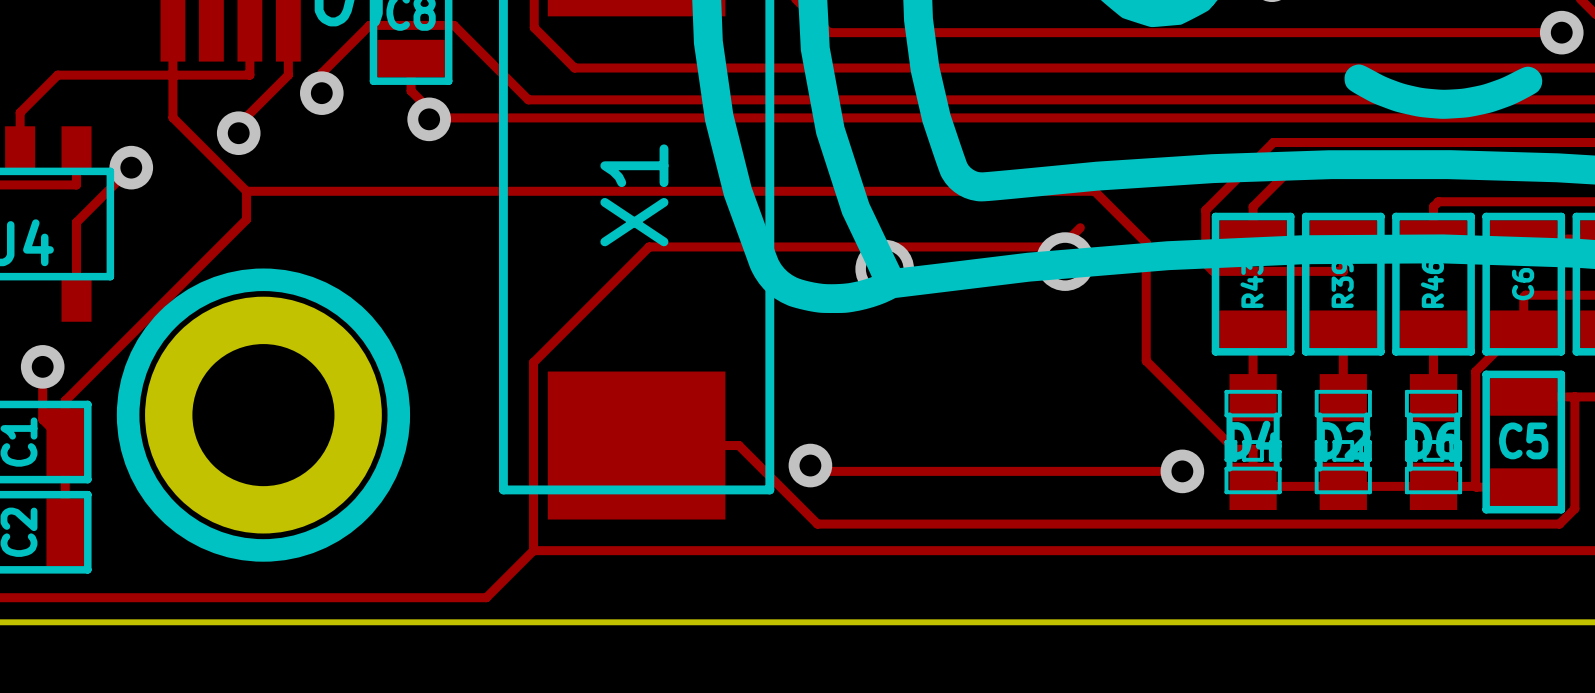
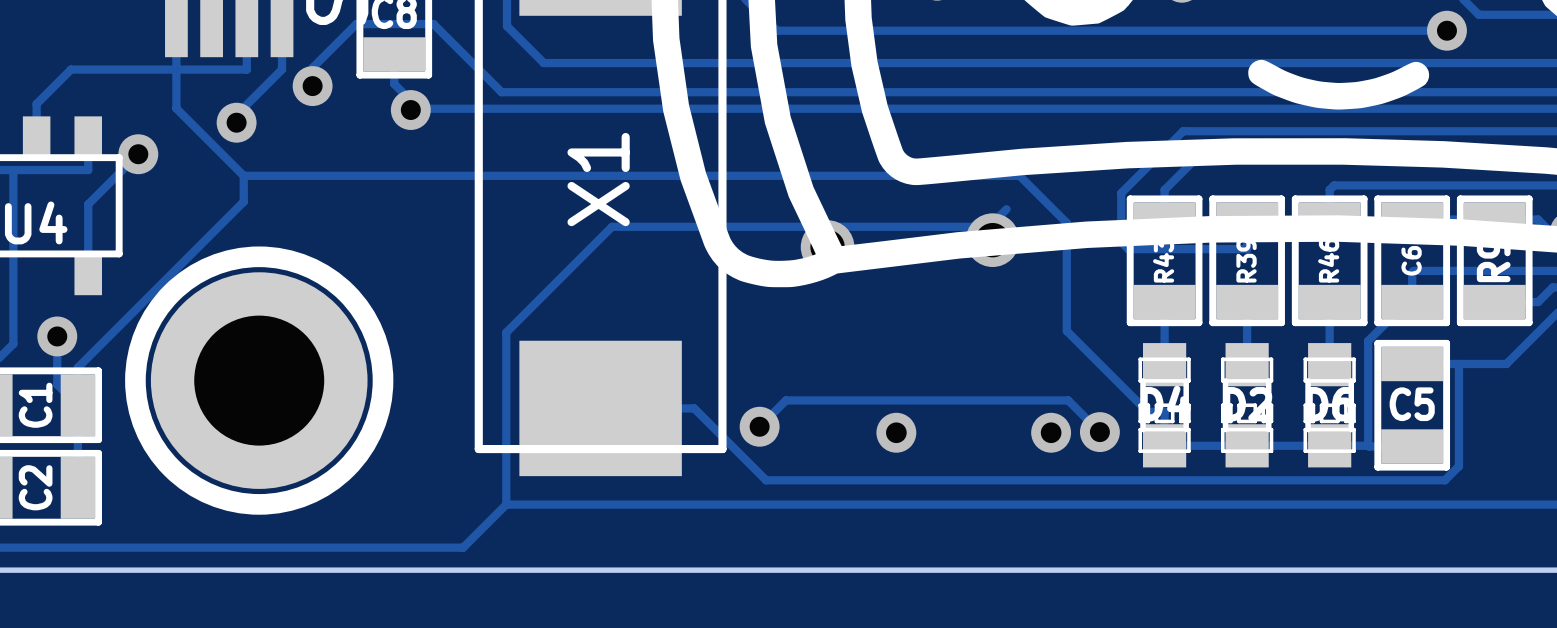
track: (810, 465) (816, 471) (1182, 471) -> (759, 426) (785, 400) (1068, 400) (1099, 432)
via: none -> (896, 432)
via: none -> (1051, 432)

